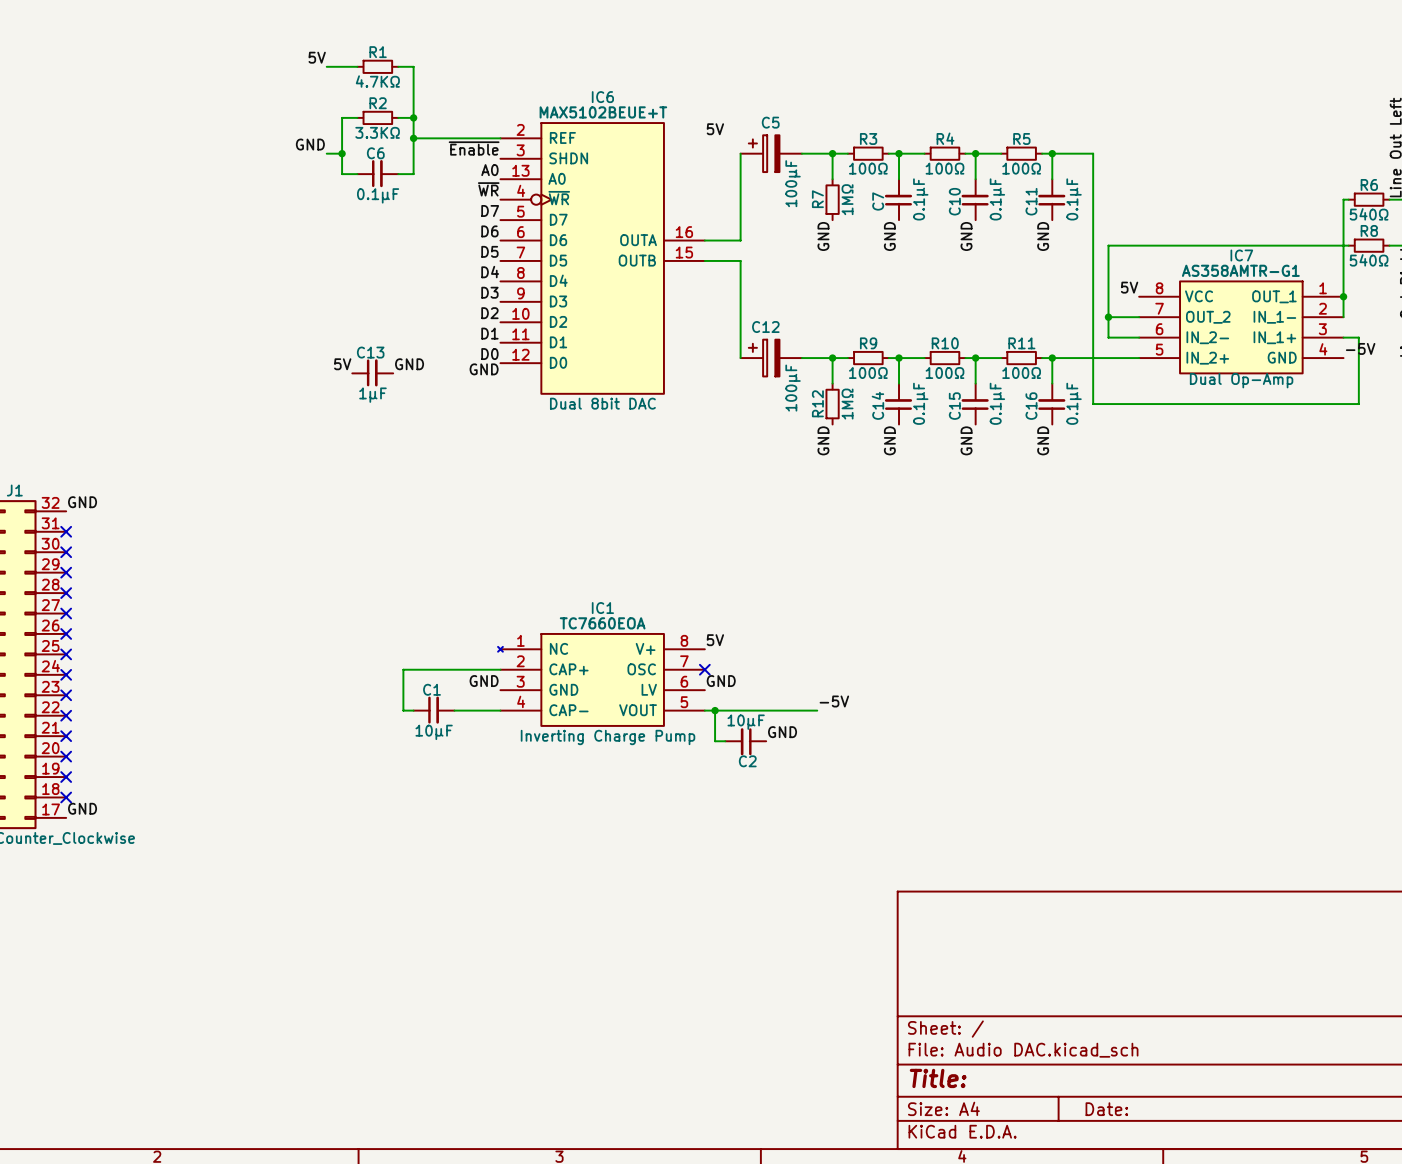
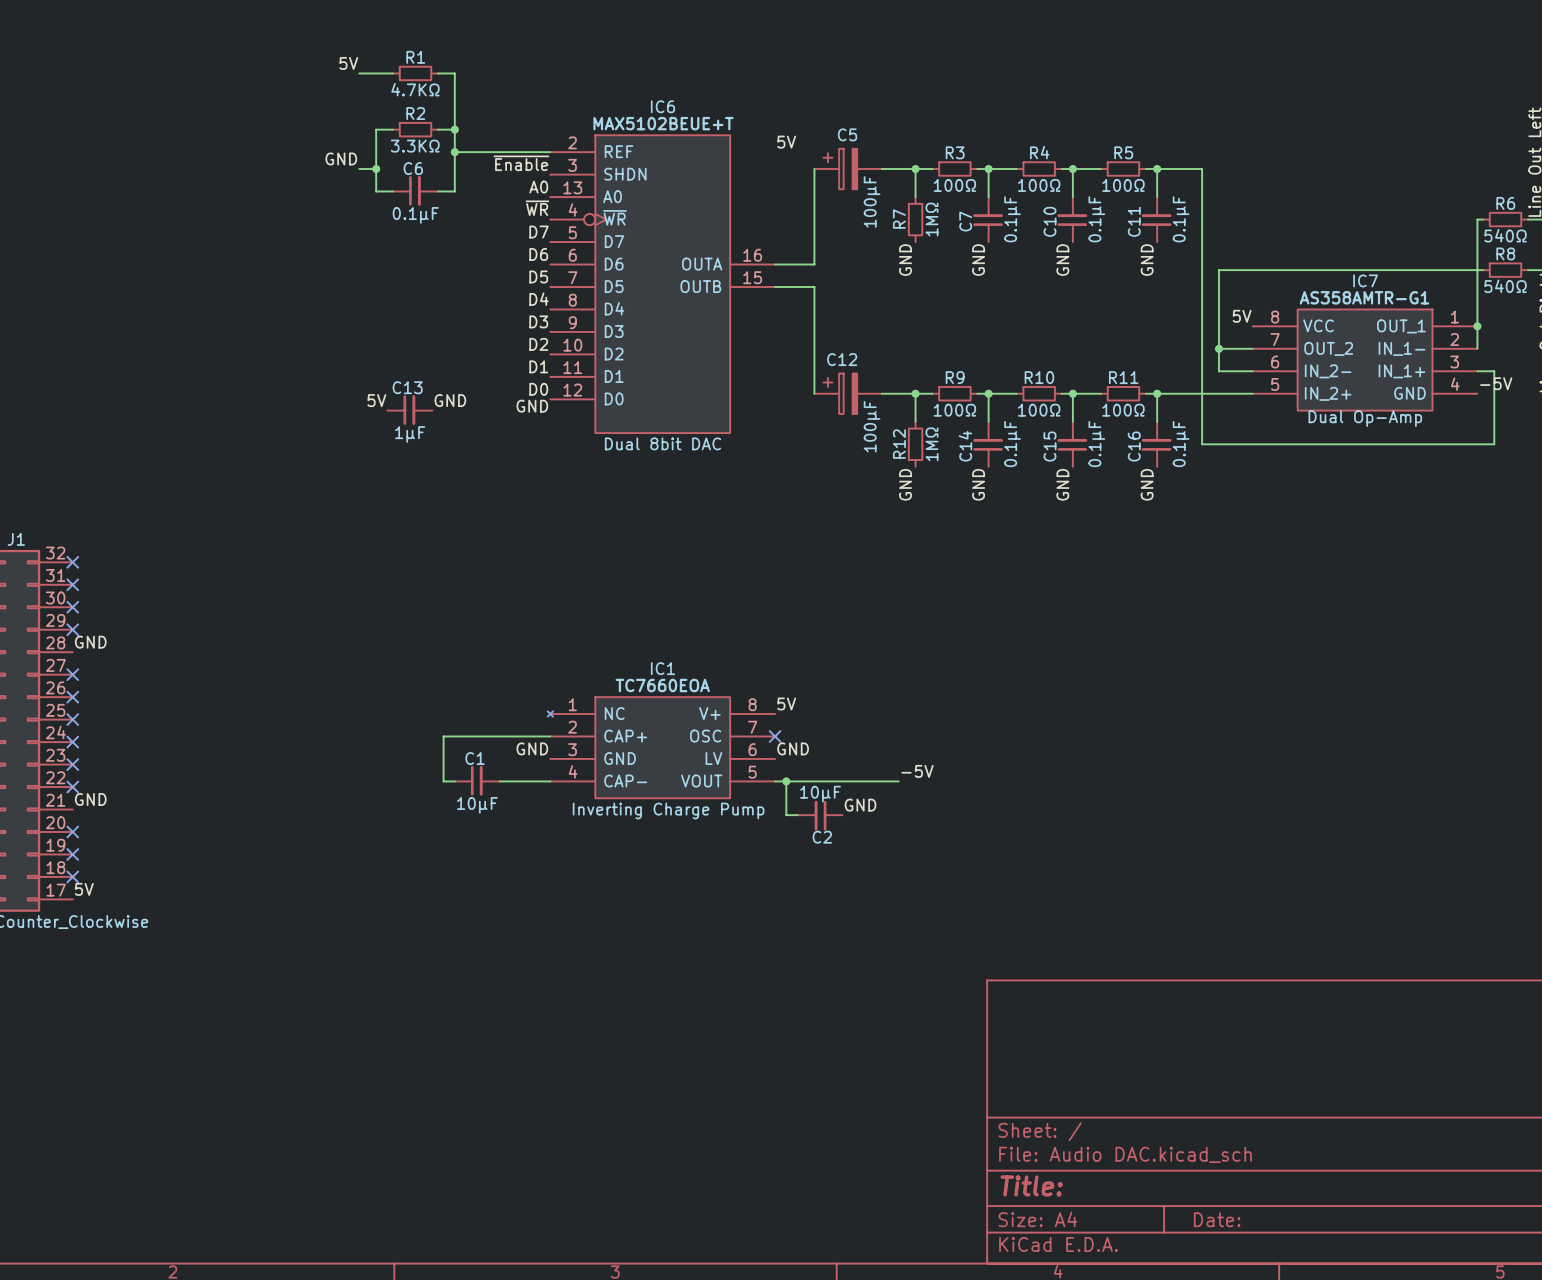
label position: GND (82, 502) -> GND (90, 642)
no-connect mark: none -> (72, 562)
no-connect mark: (66, 593) -> none
label: none -> GND (90, 799)
no-connect mark: (66, 736) -> none
label: GND (82, 808) -> 5V (84, 889)

